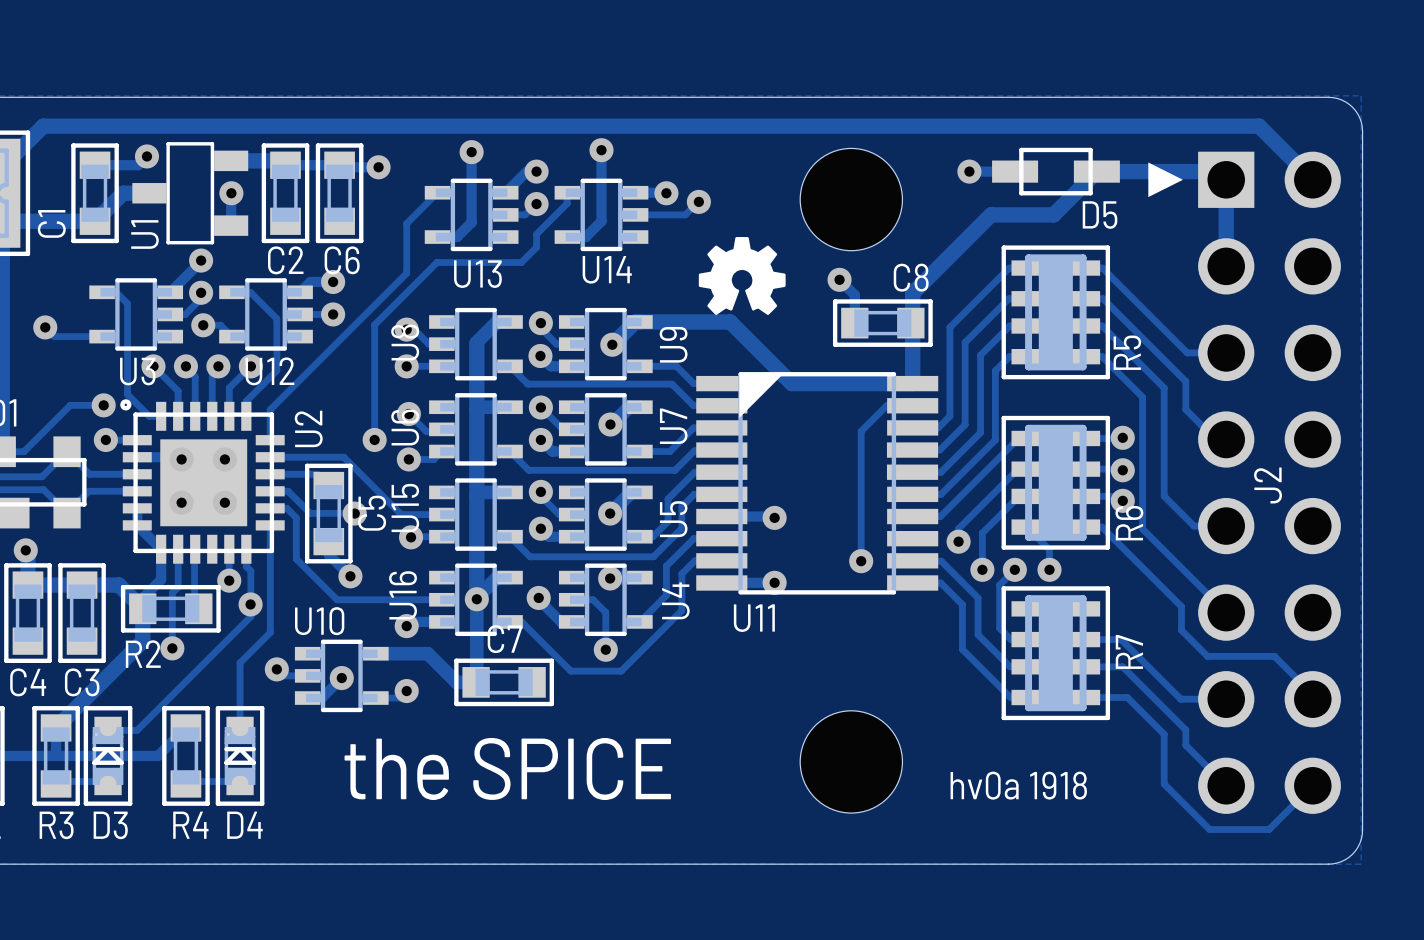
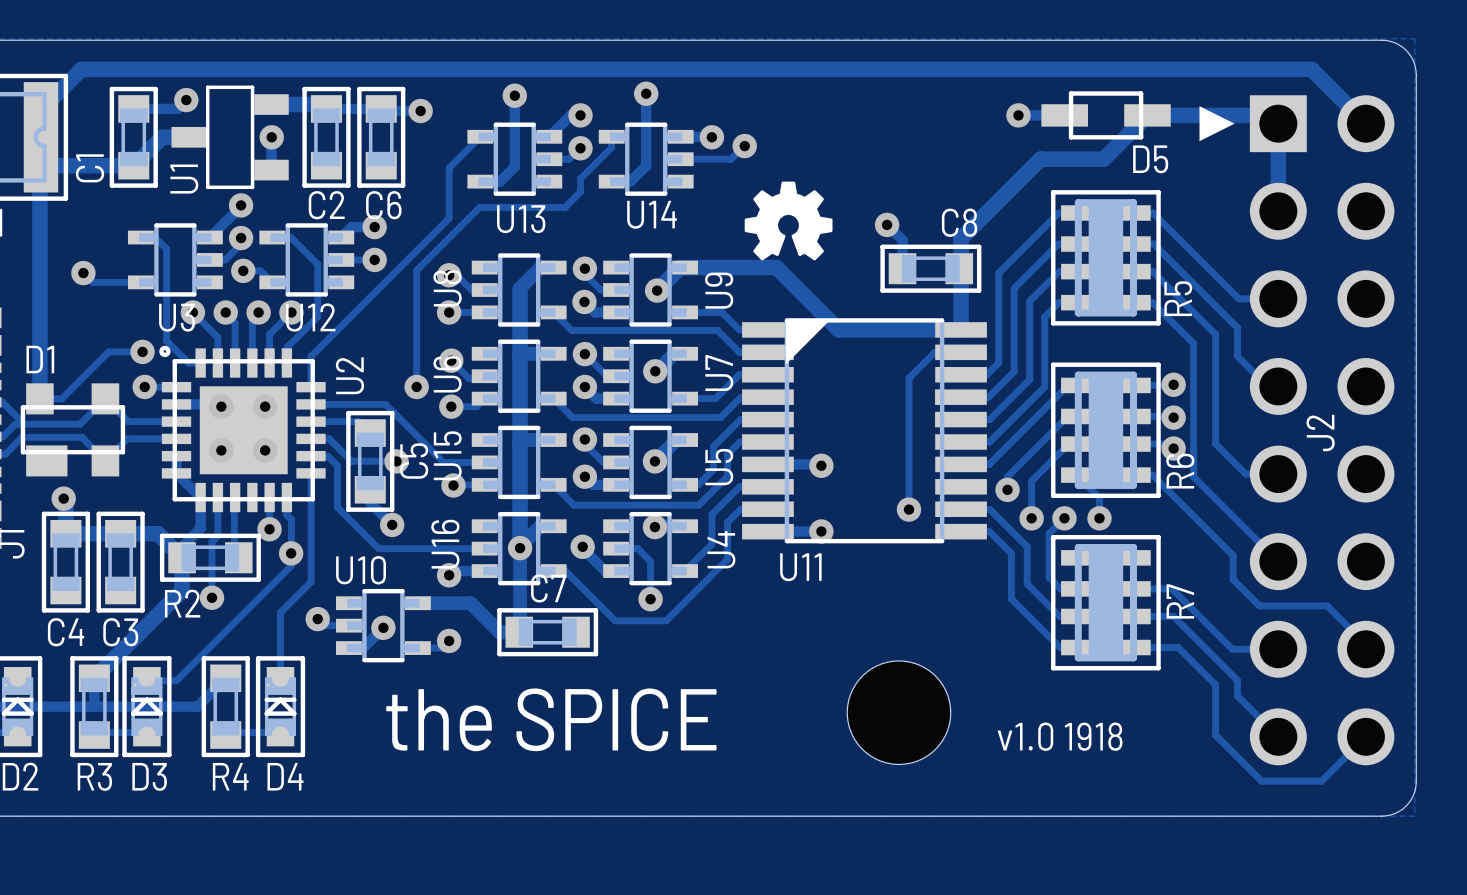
hole: (851, 199) -> none
text: hv0a 1918 (1018, 785) -> v1.0 1918 (1060, 736)

